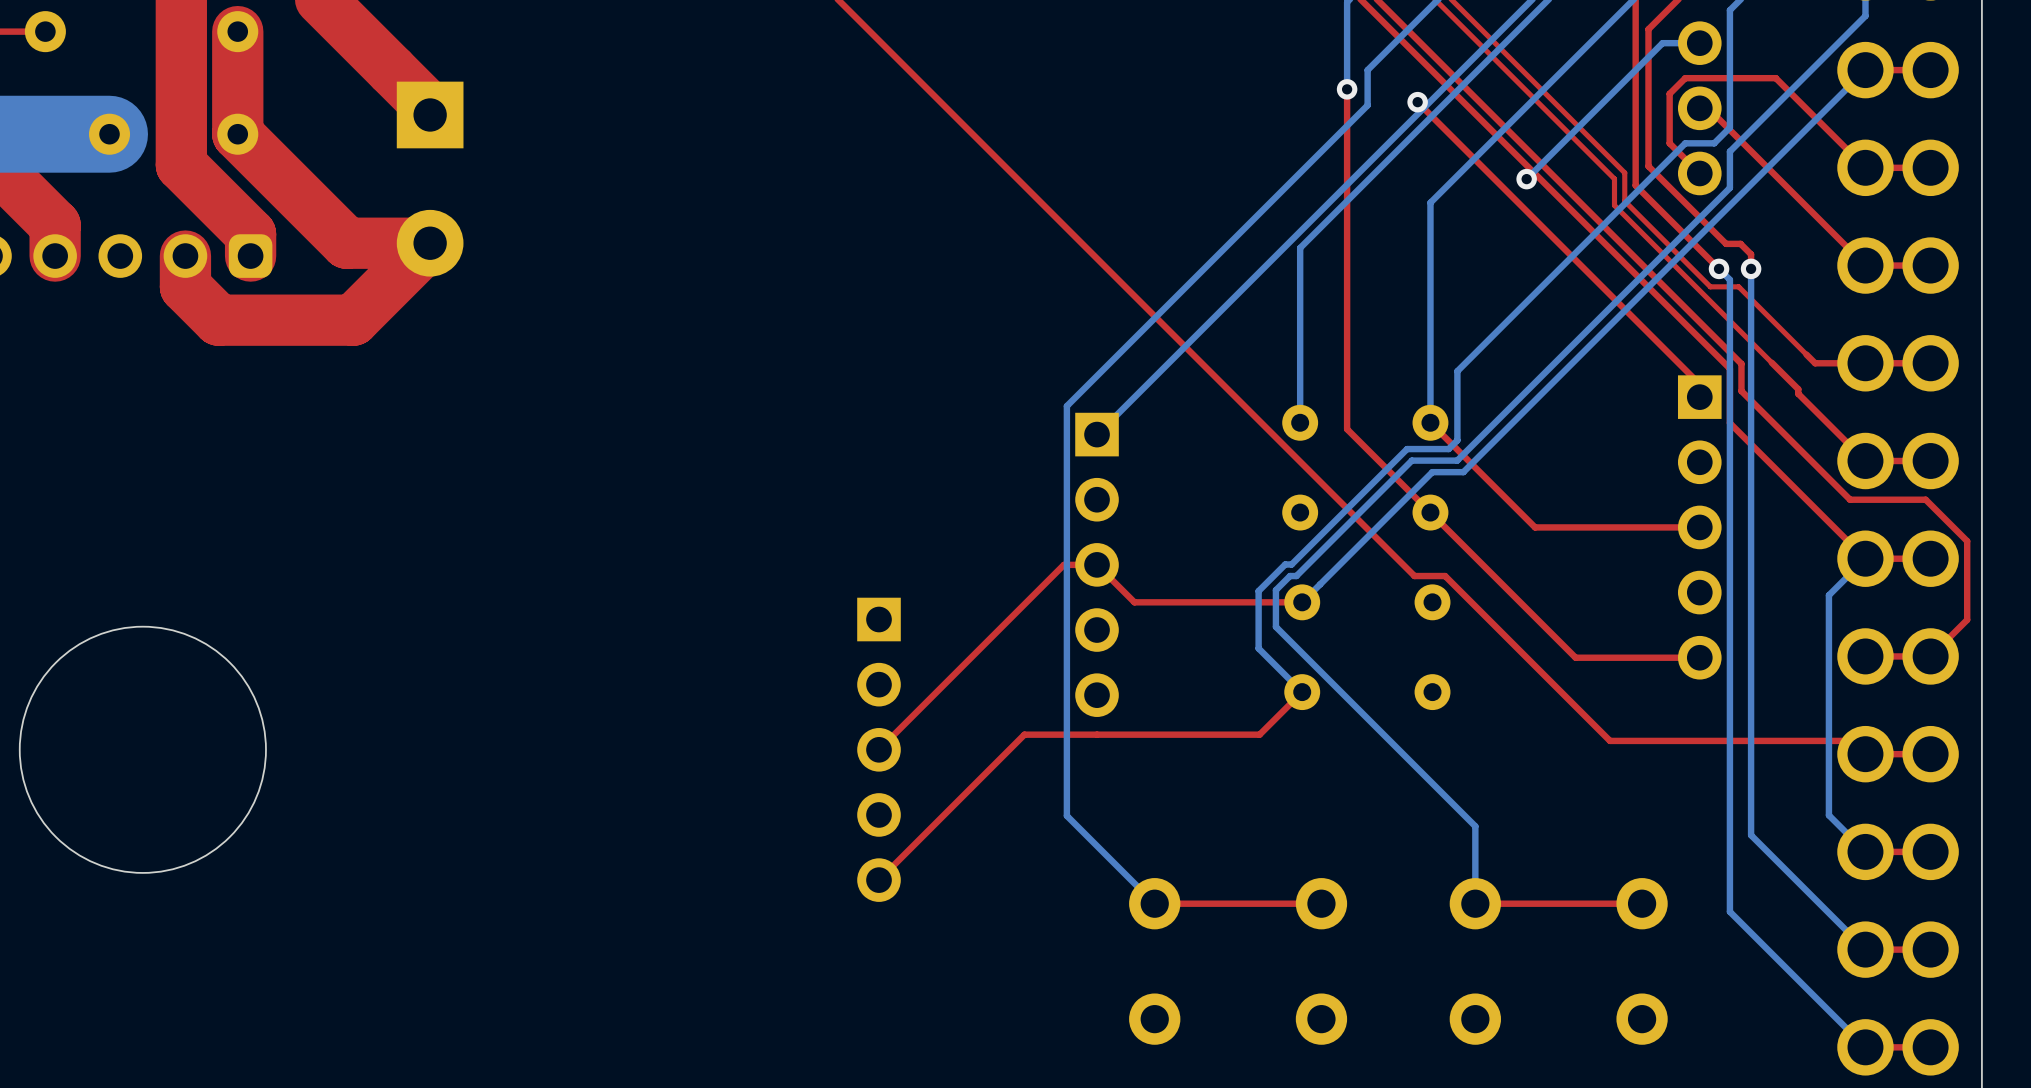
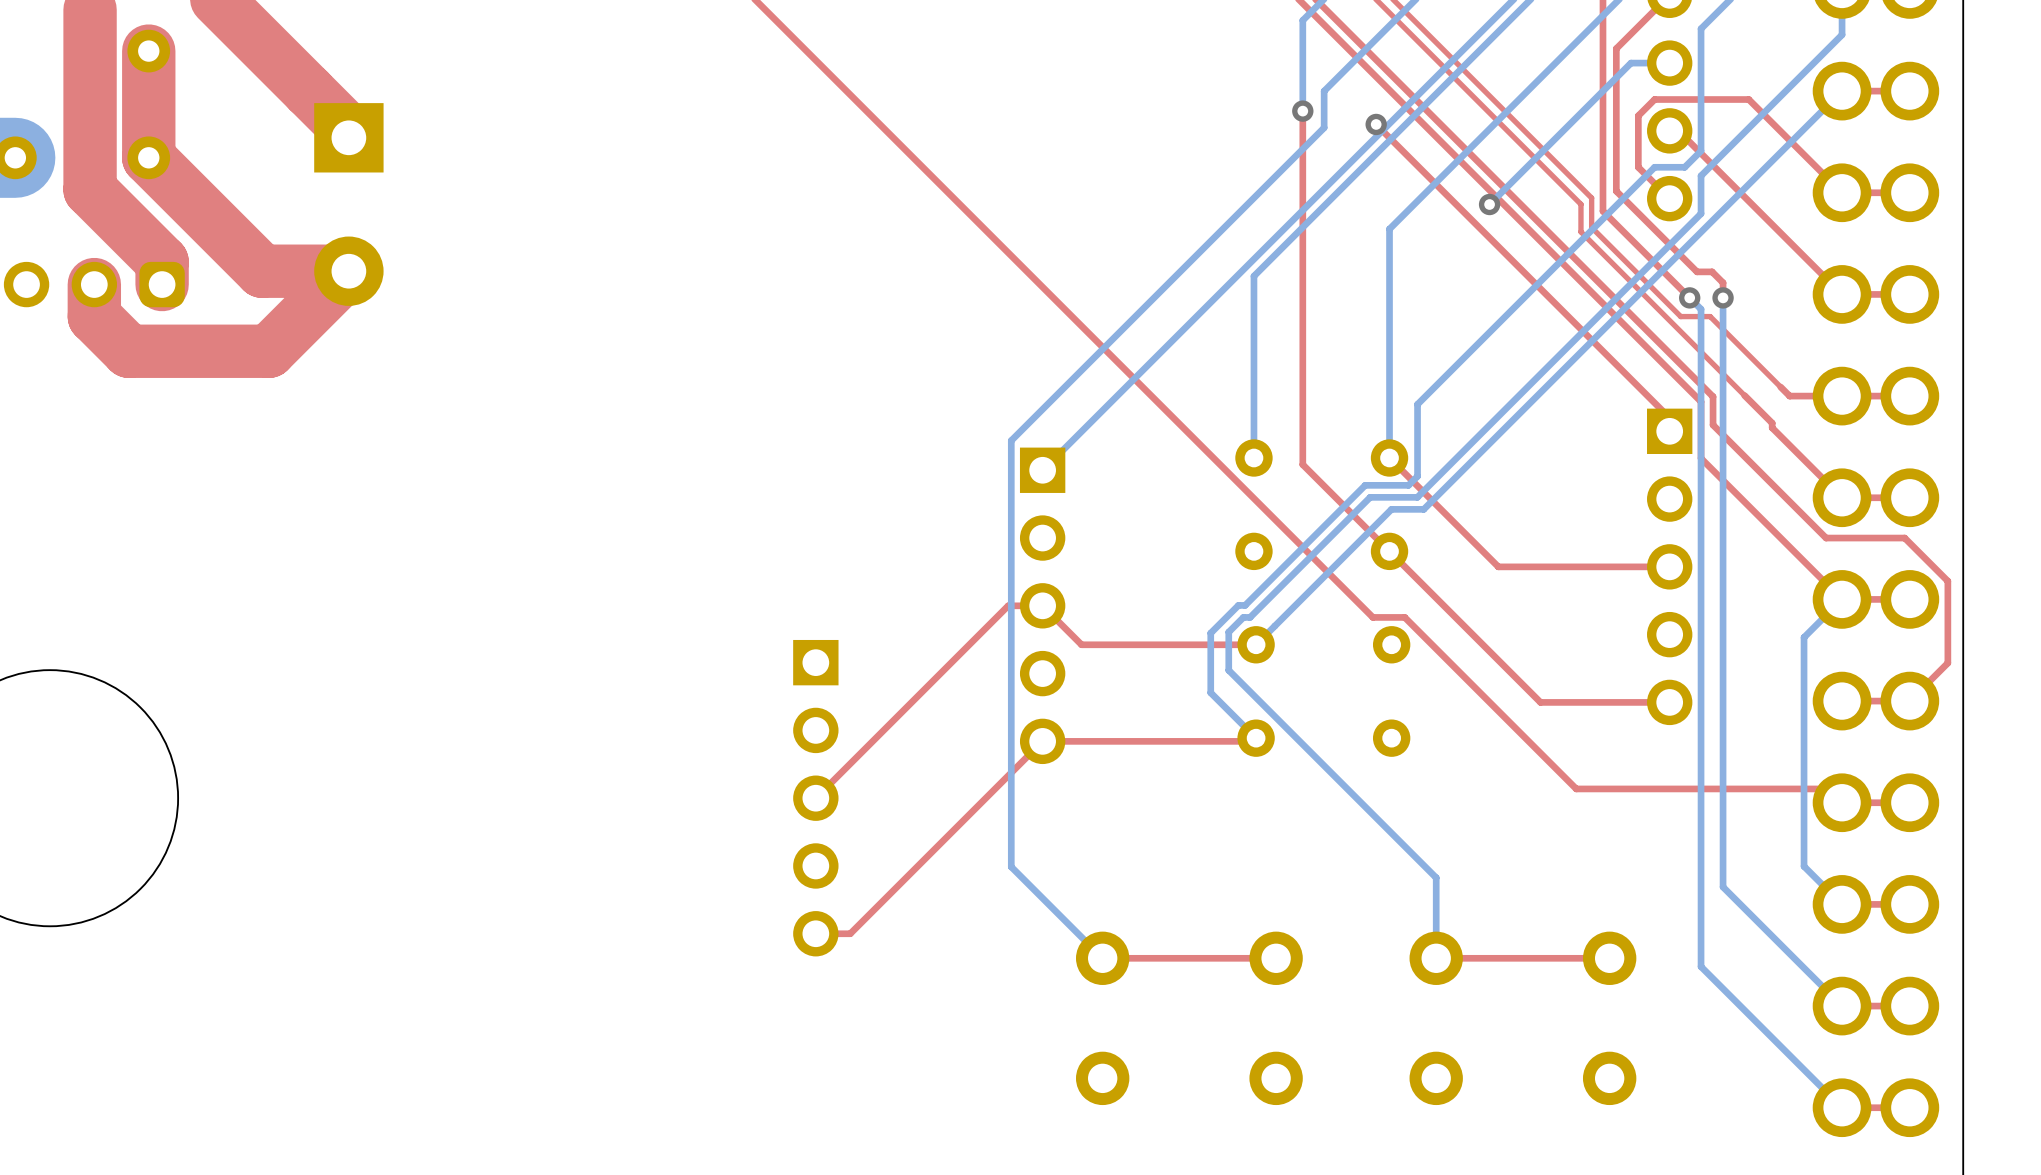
top track: (1299, 695) (1259, 734) (1024, 734) (879, 880) -> (1252, 741) (1042, 741) (850, 933) (815, 933)

